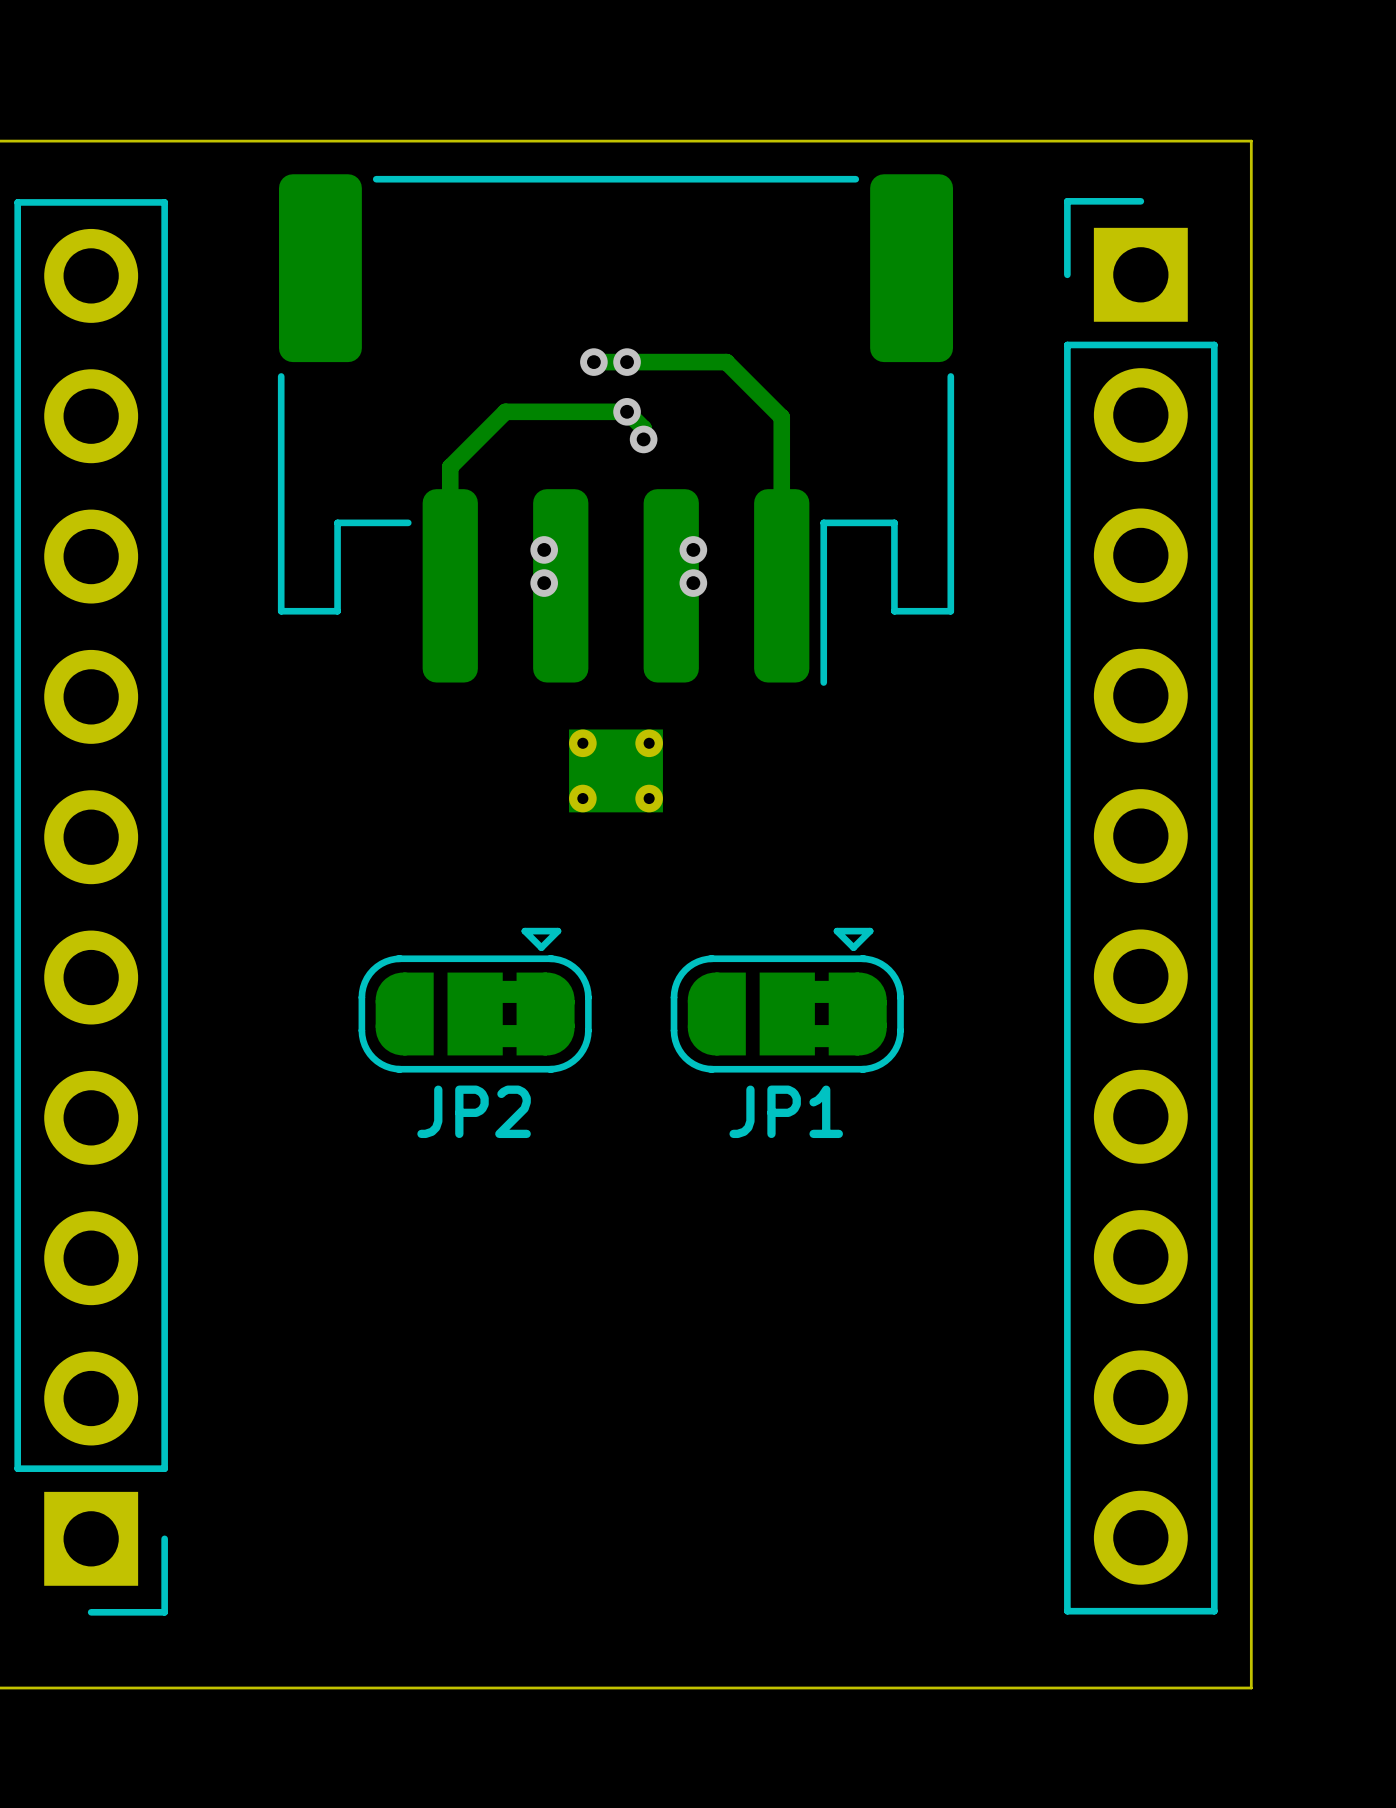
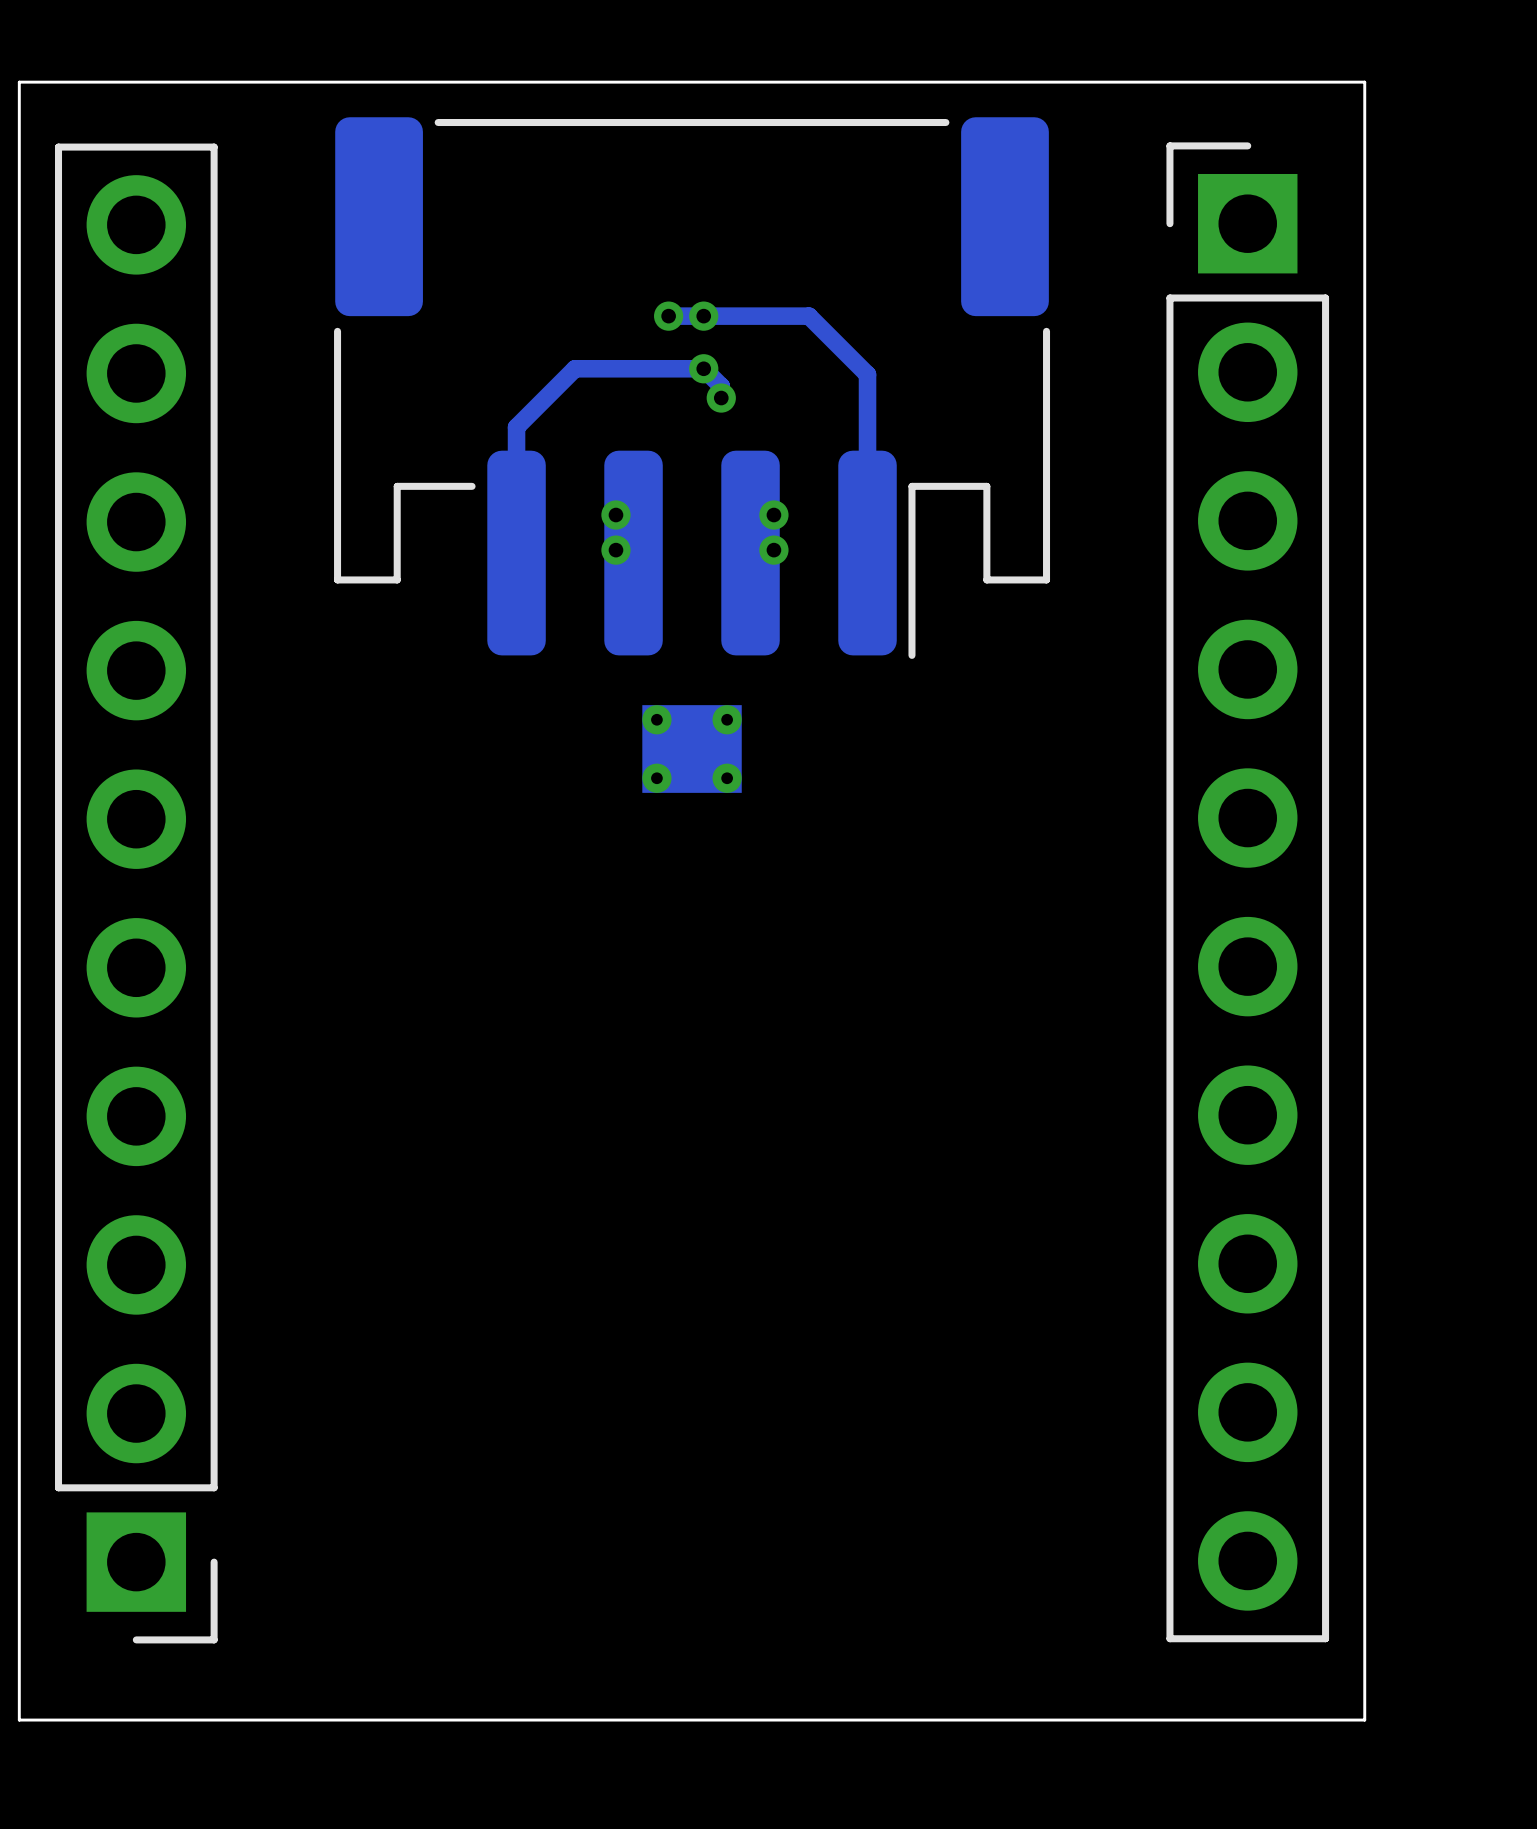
JP2: (475, 1000) -> none
JP1: (787, 1000) -> none

